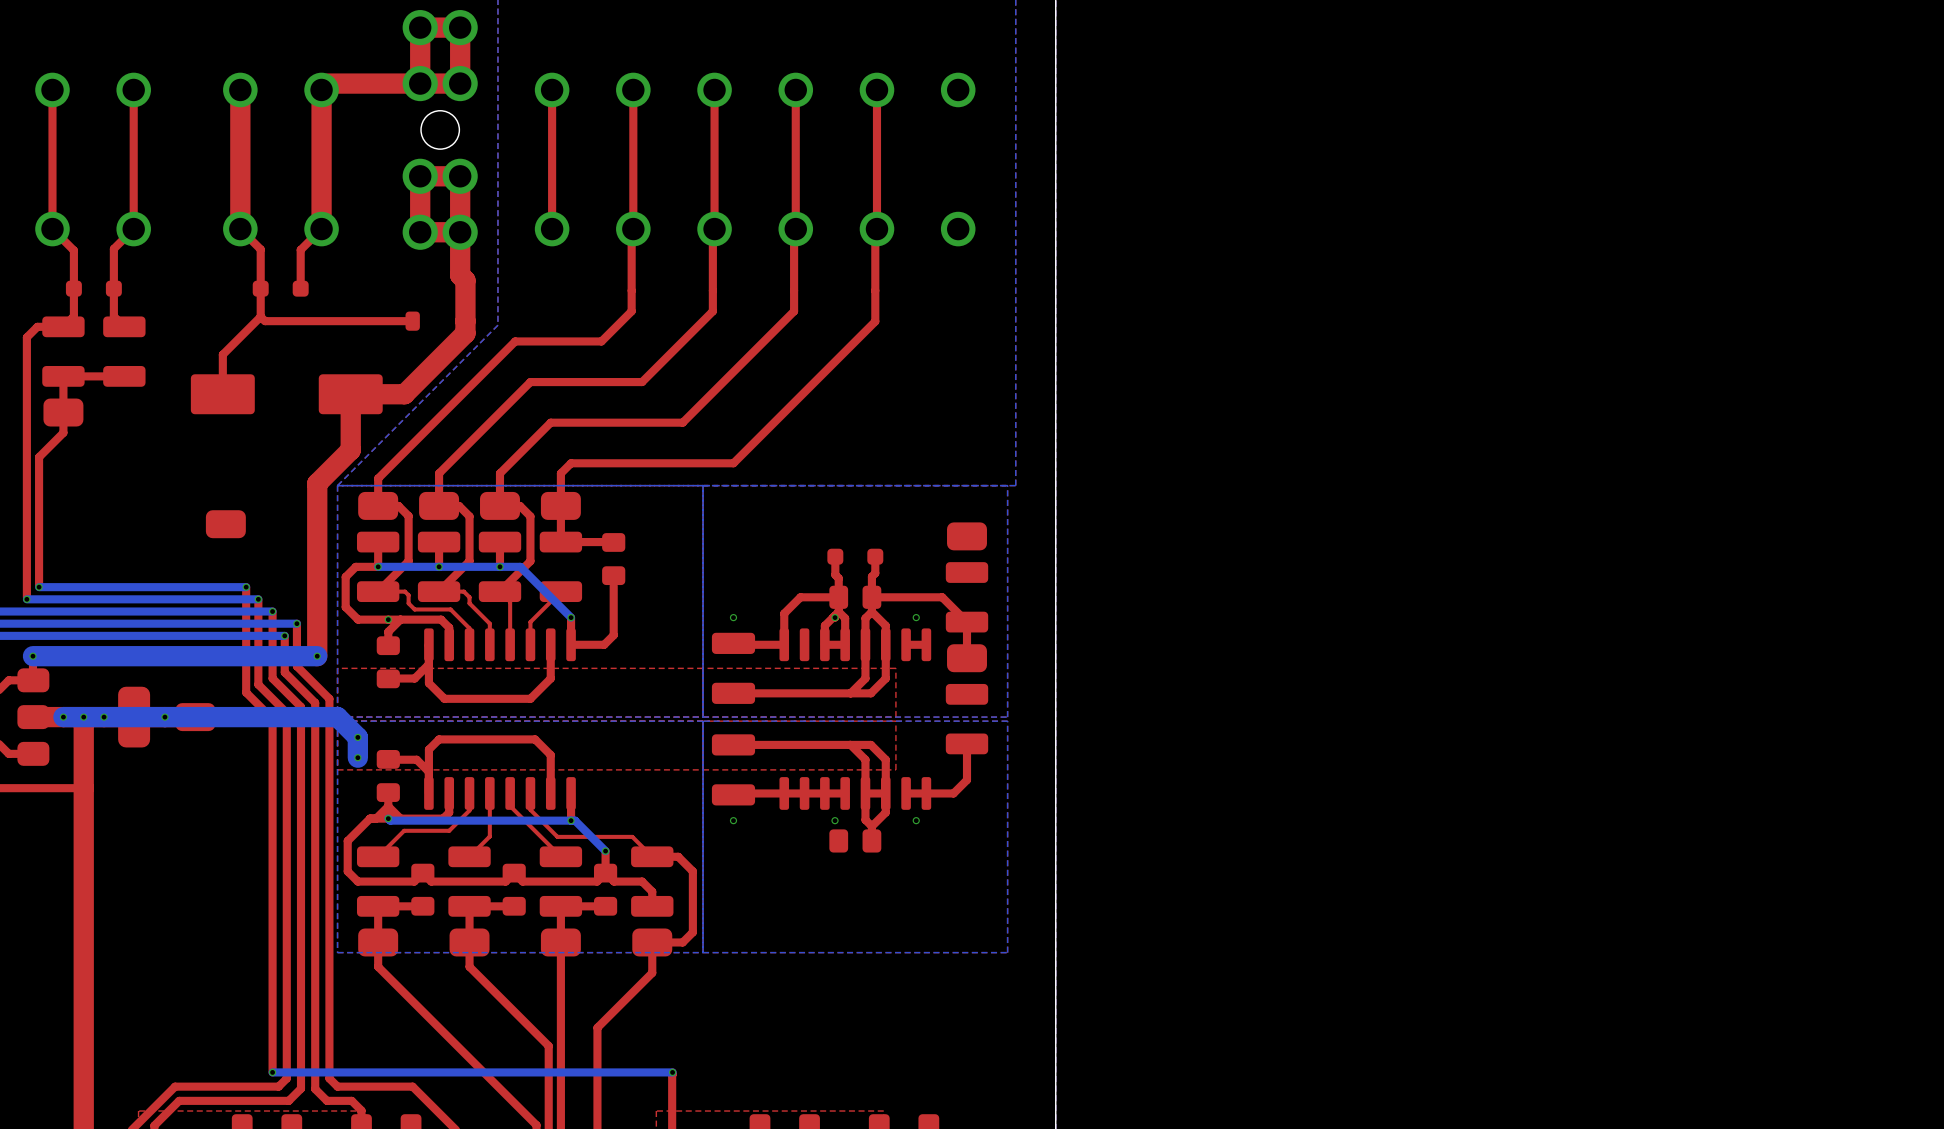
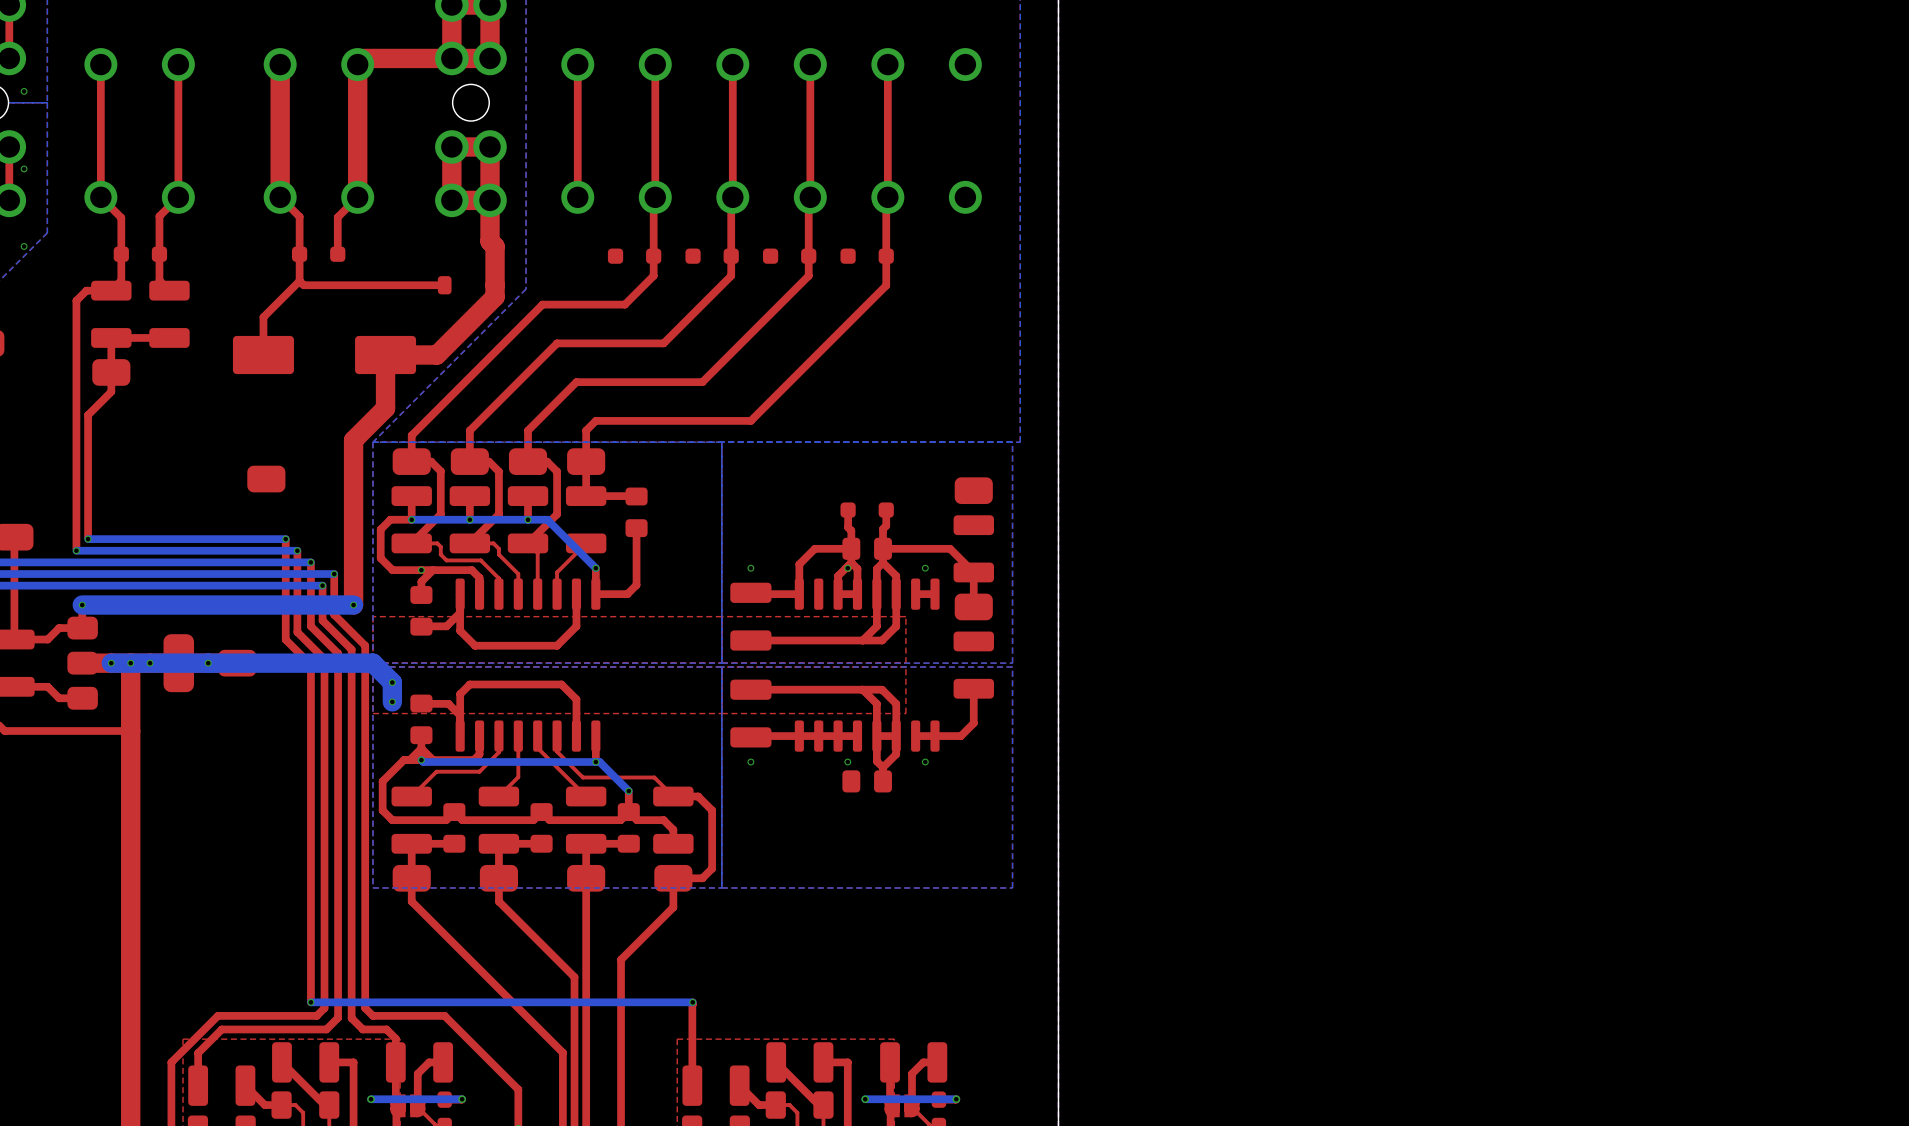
part: none -> (634, 256)
part: none -> (712, 256)
part: none -> (789, 256)
part: none -> (867, 256)

